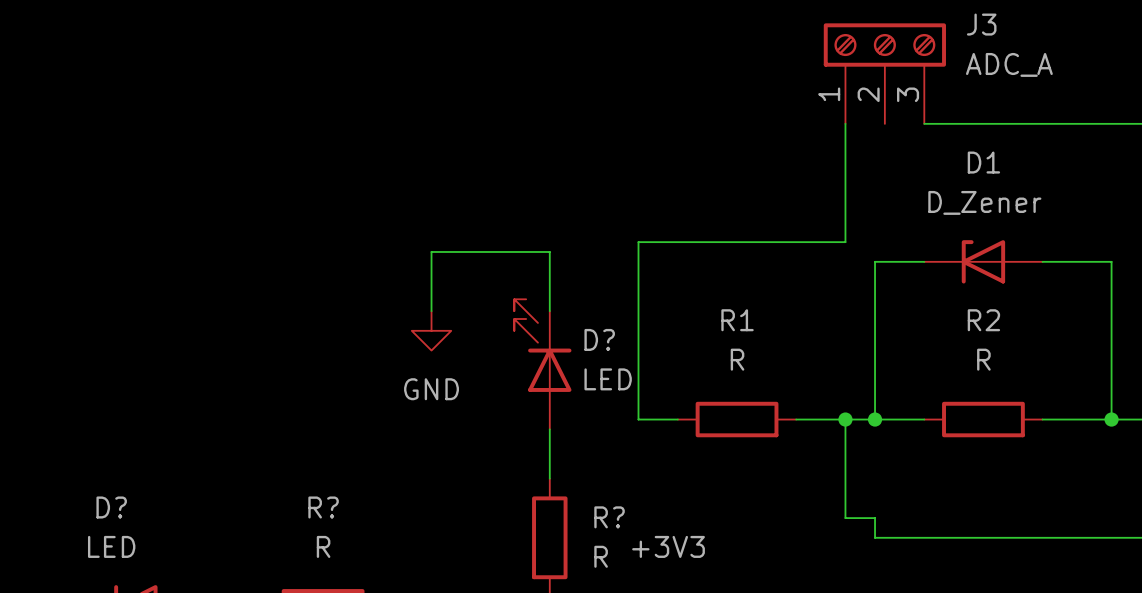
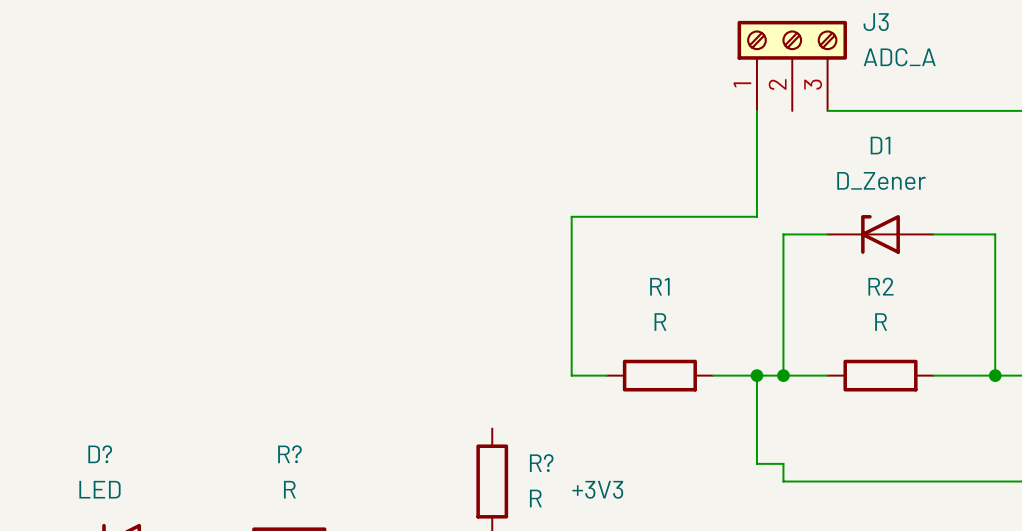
wire: (431, 311) (431, 251) (549, 251) (549, 311) -> none
power symbol: GND (431, 330) -> none
D?: LED (542, 364) -> none
wire: (549, 429) (549, 478) -> none

